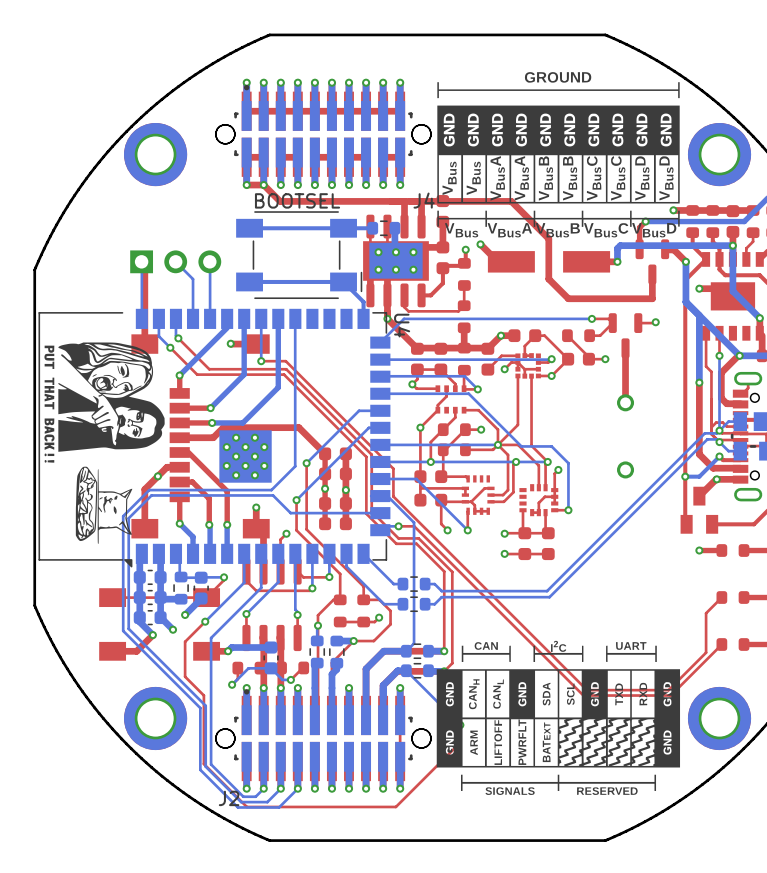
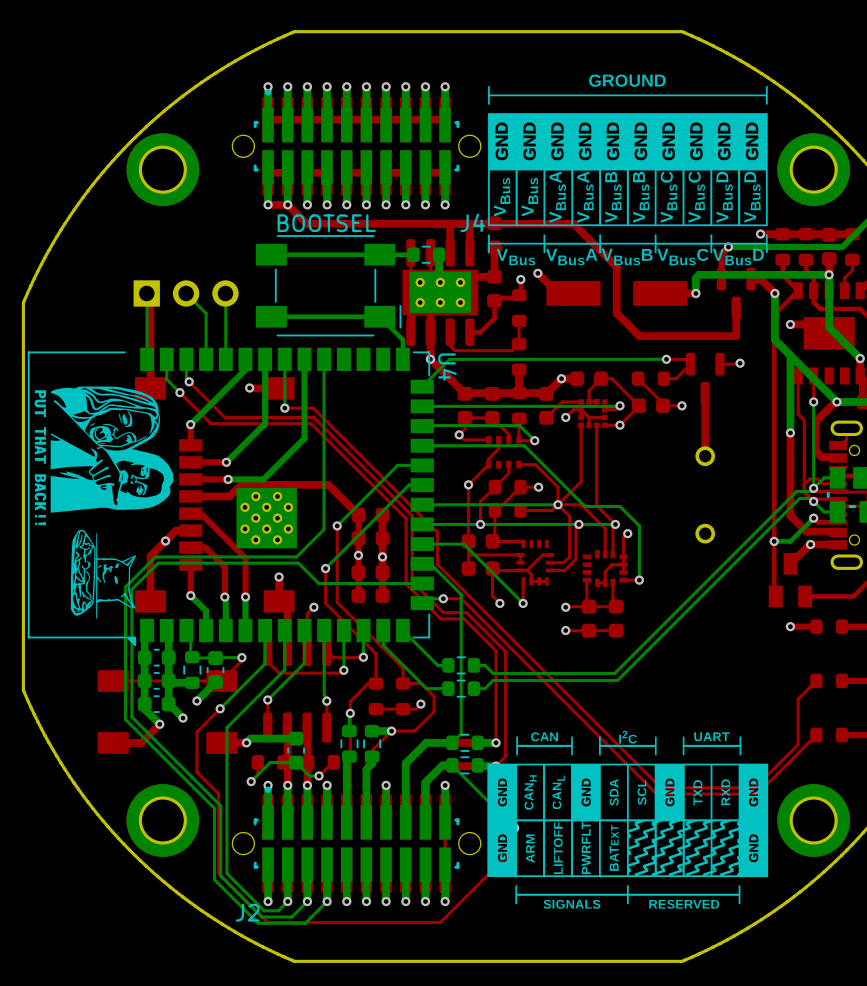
J4 footprint: [215, 84, 432, 168] -> [253, 89, 460, 185]
J2 footprint: [215, 689, 432, 772] -> [253, 786, 460, 882]

